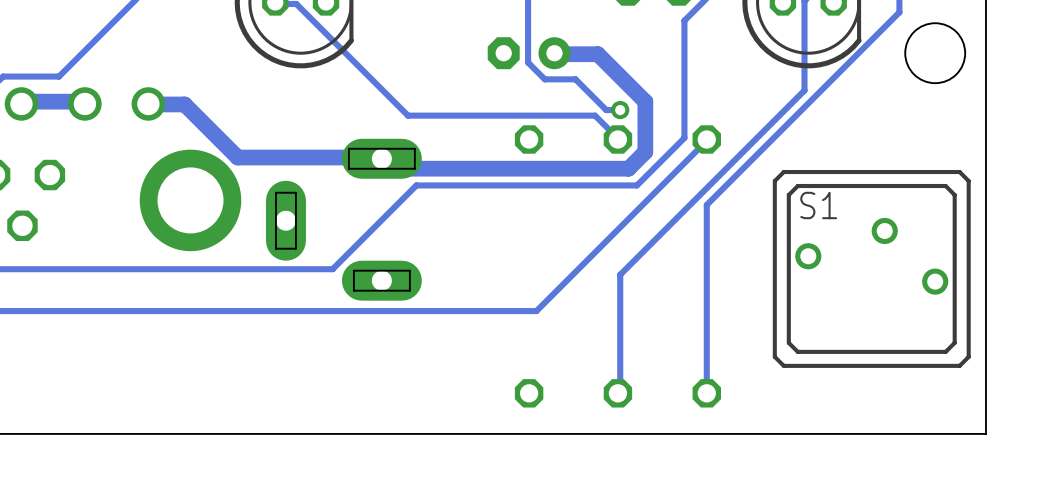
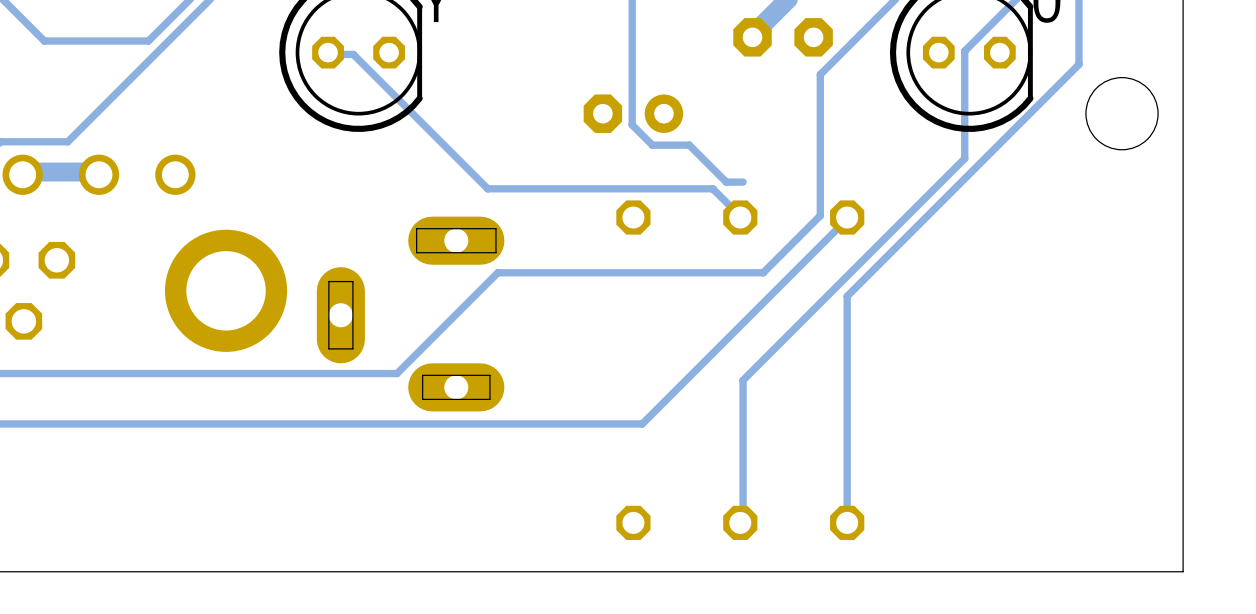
track: (554, 53) (597, 54) (645, 101) (645, 151) (628, 168) (391, 168) (381, 158) (374, 157) (237, 157) (184, 104) (148, 103) -> none
via: (620, 110) -> none
S1: (871, 268) -> none

